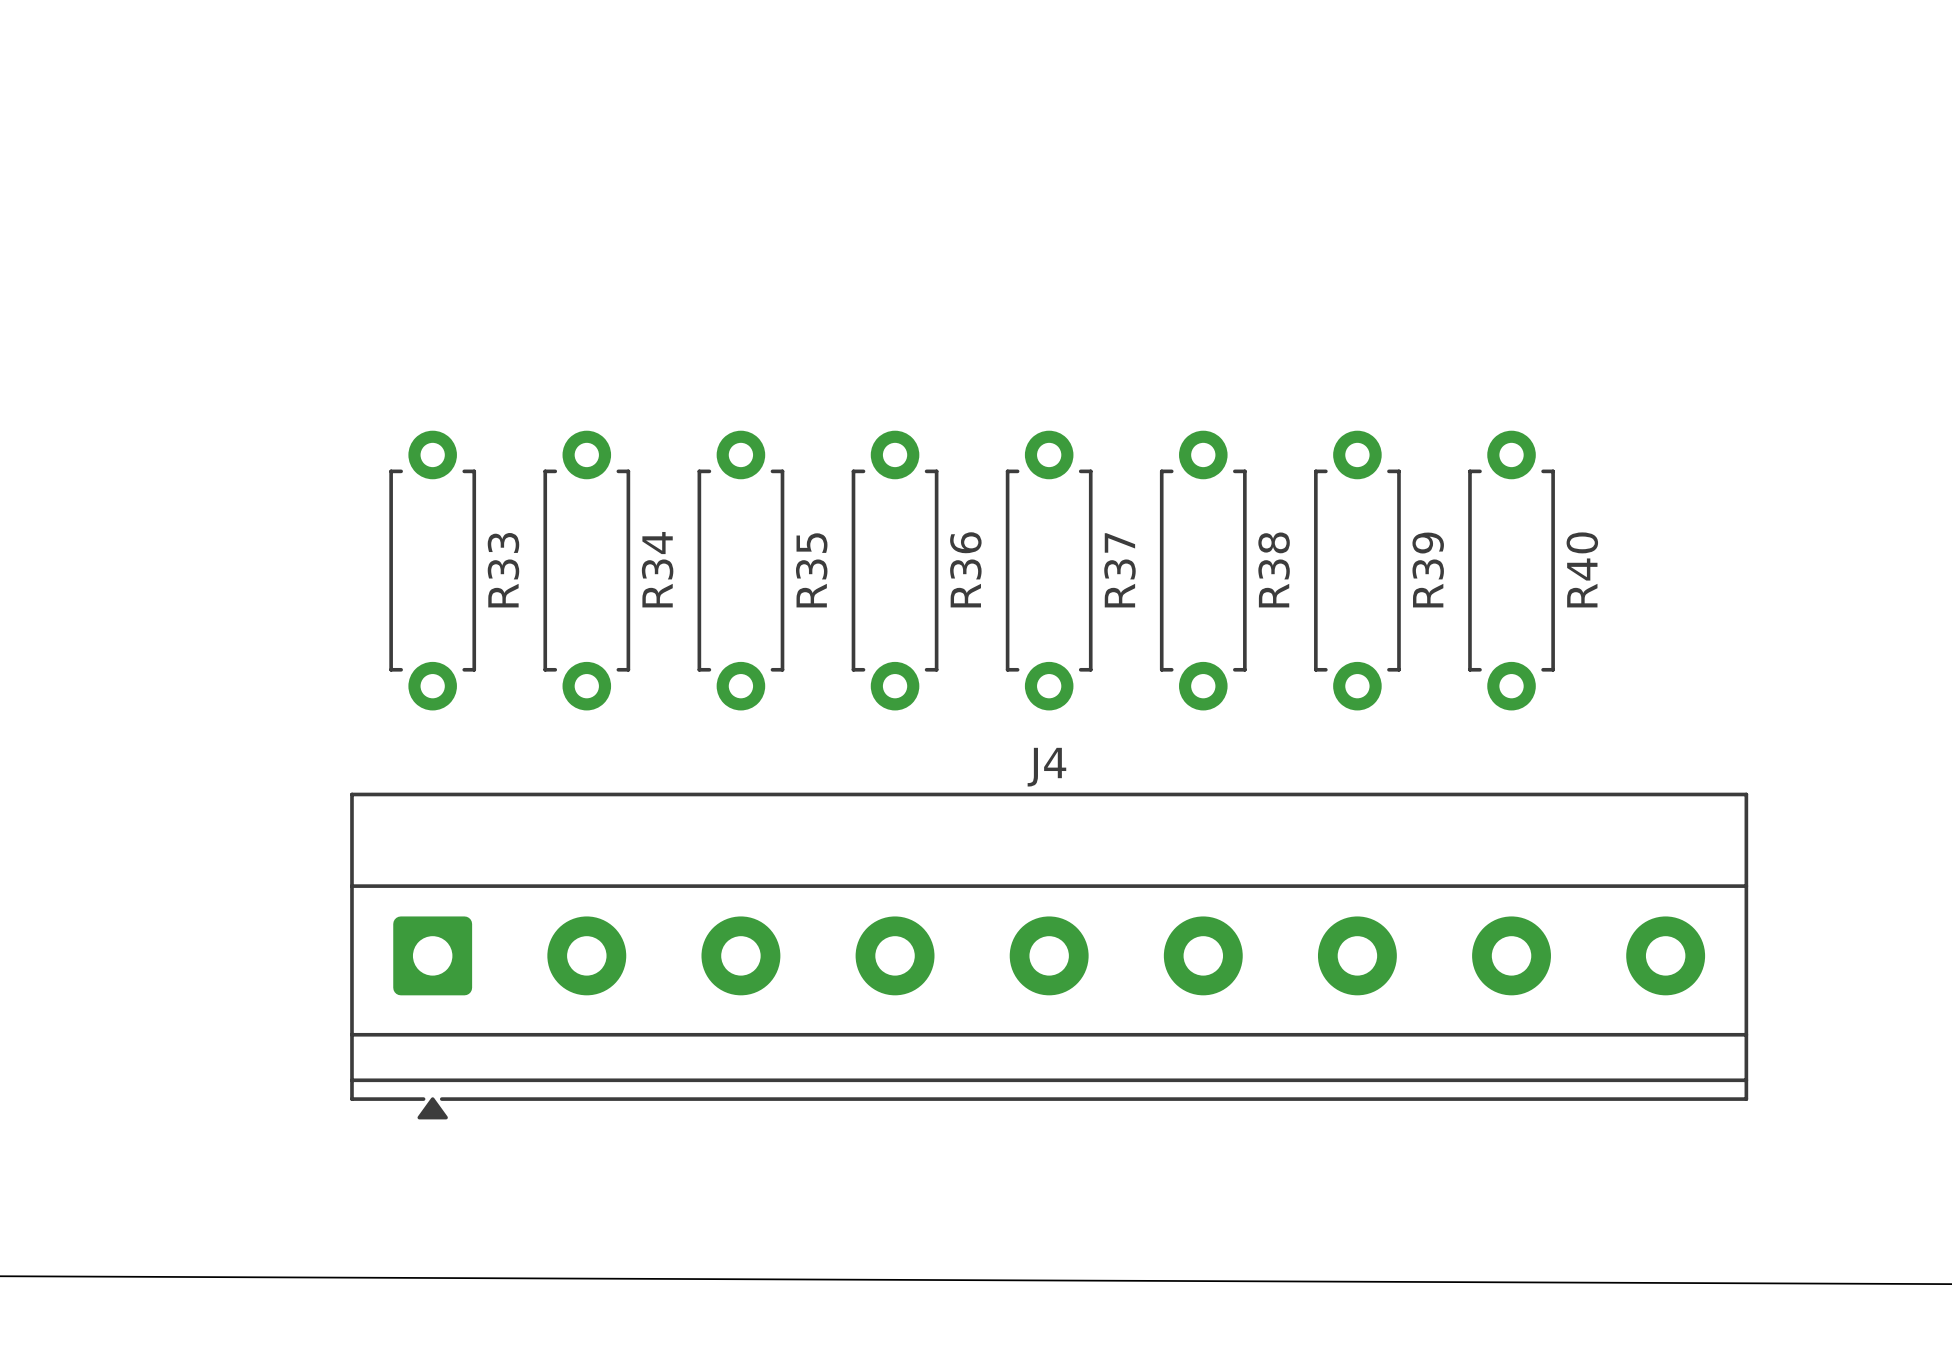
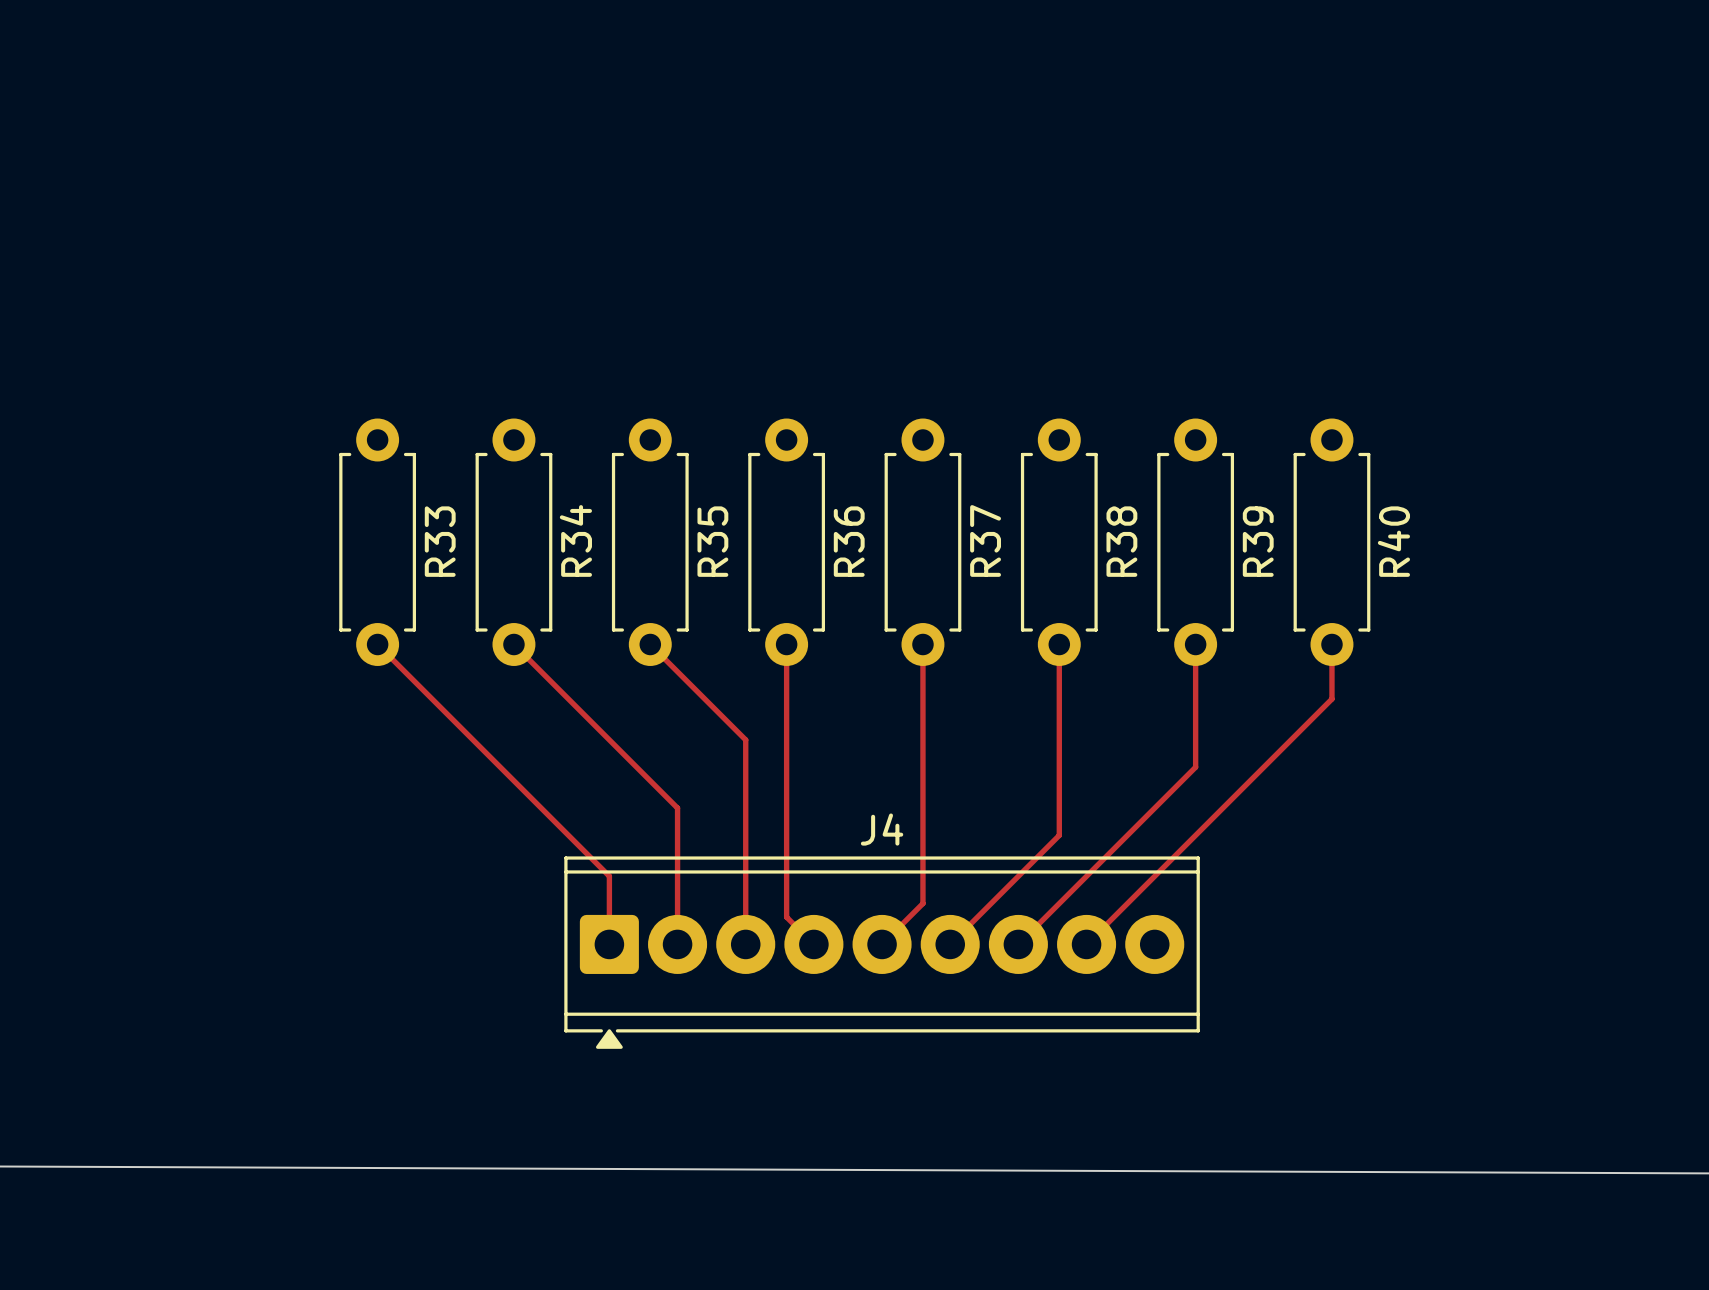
track: none -> (377, 644) (609, 876) (609, 944)
track: none -> (513, 644) (677, 808) (677, 944)
track: none -> (650, 644) (745, 739) (745, 944)
track: none -> (786, 644) (786, 917) (813, 944)
track: none -> (922, 644) (922, 903) (882, 944)
track: none -> (1059, 644) (1059, 835) (950, 944)
track: none -> (1195, 644) (1195, 767) (1018, 944)
track: none -> (1331, 644) (1331, 699) (1086, 944)
J4 footprint: [350, 792, 1749, 1120] -> [564, 856, 1200, 1049]

